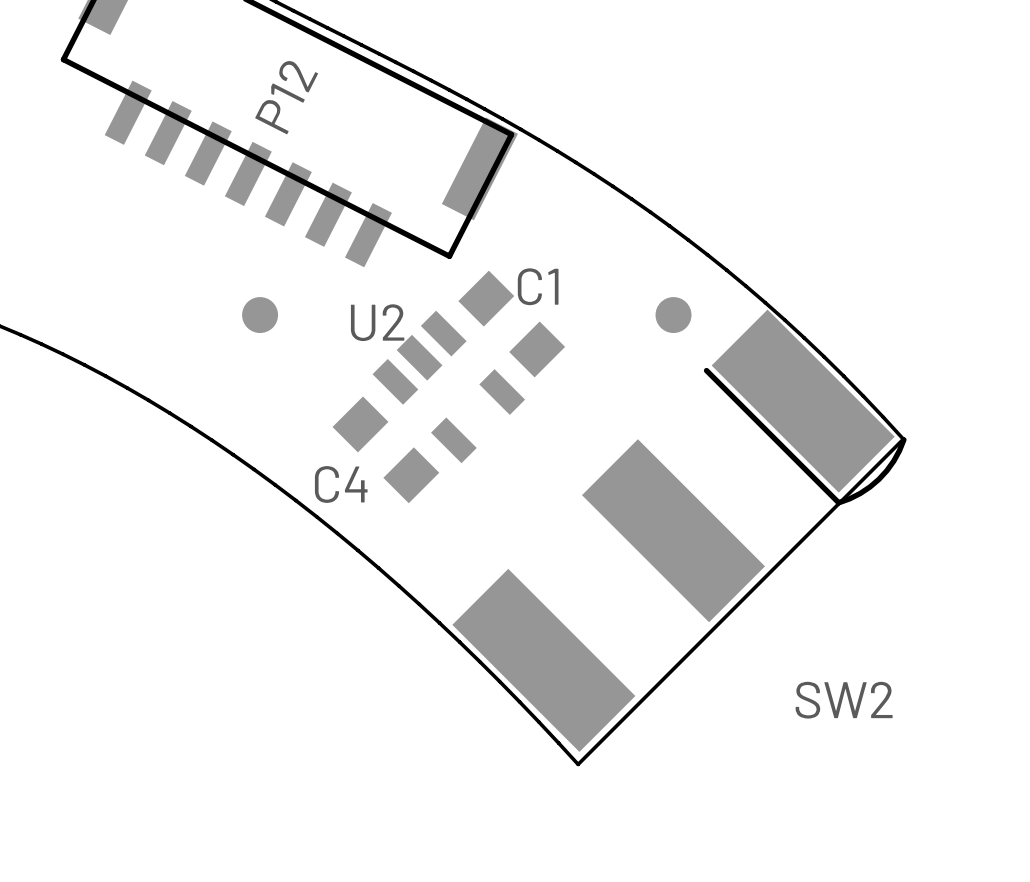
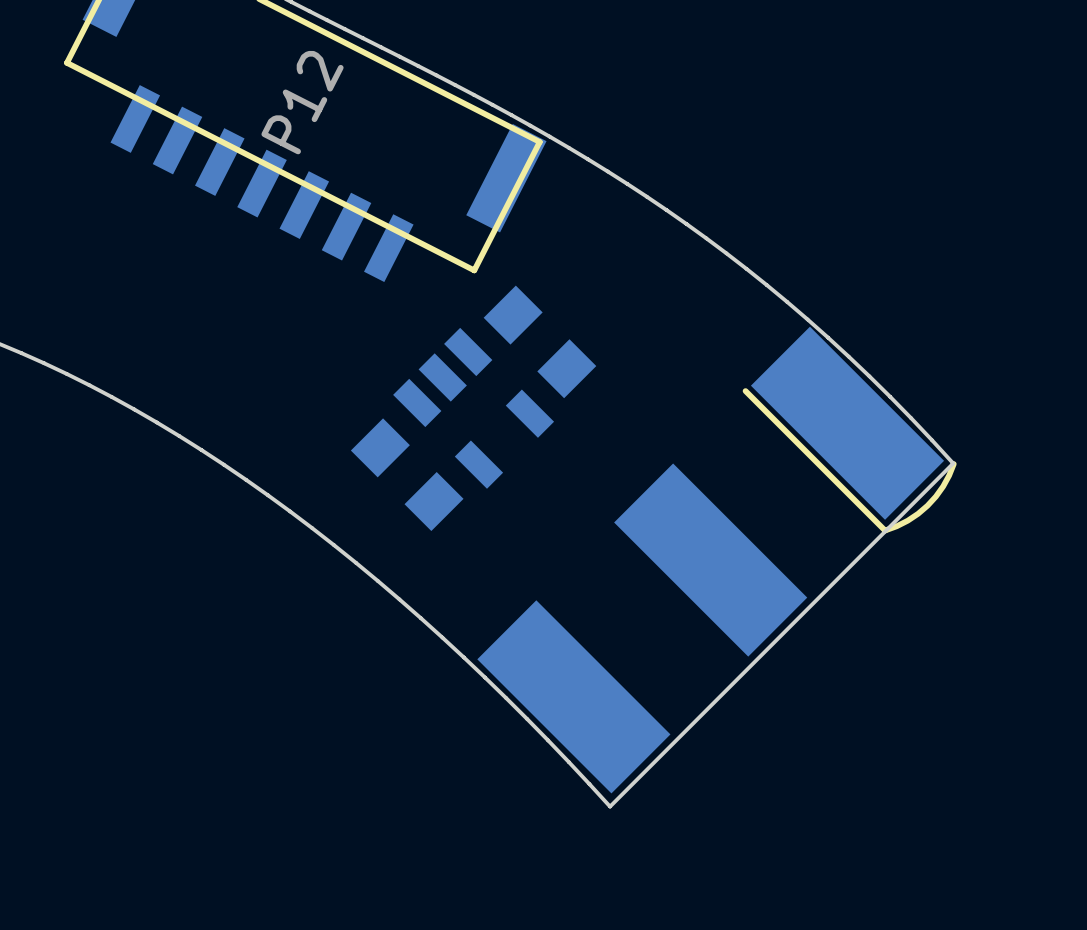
C1 name: C1 (538, 286) -> none
part: (260, 315) -> none
part: (673, 315) -> none
U2 name: U2 (377, 322) -> none
C4 name: C4 (341, 484) -> none
SW2 name: SW2 (844, 700) -> none

